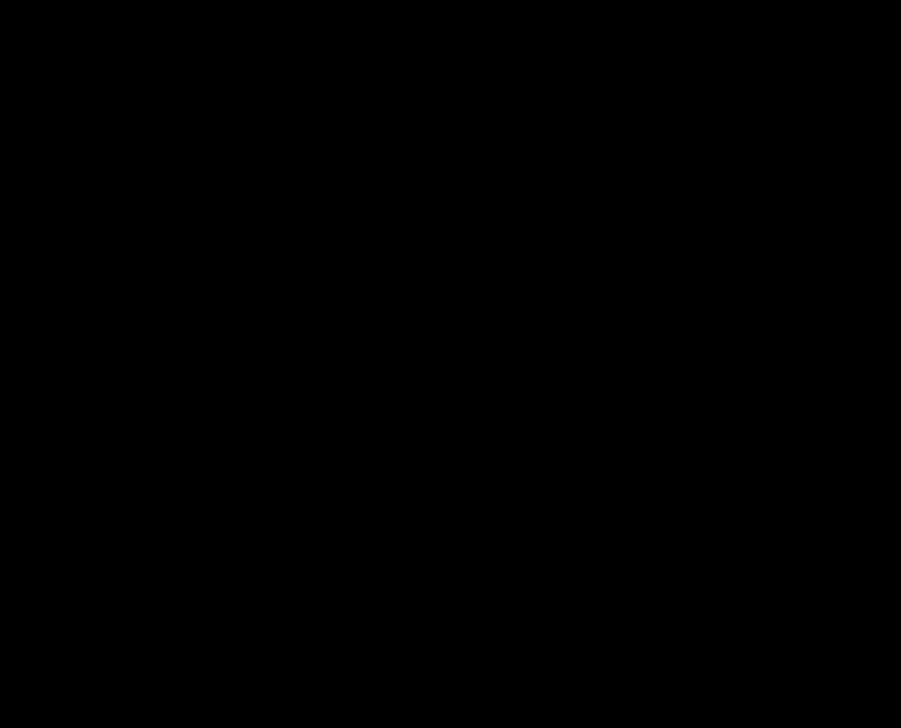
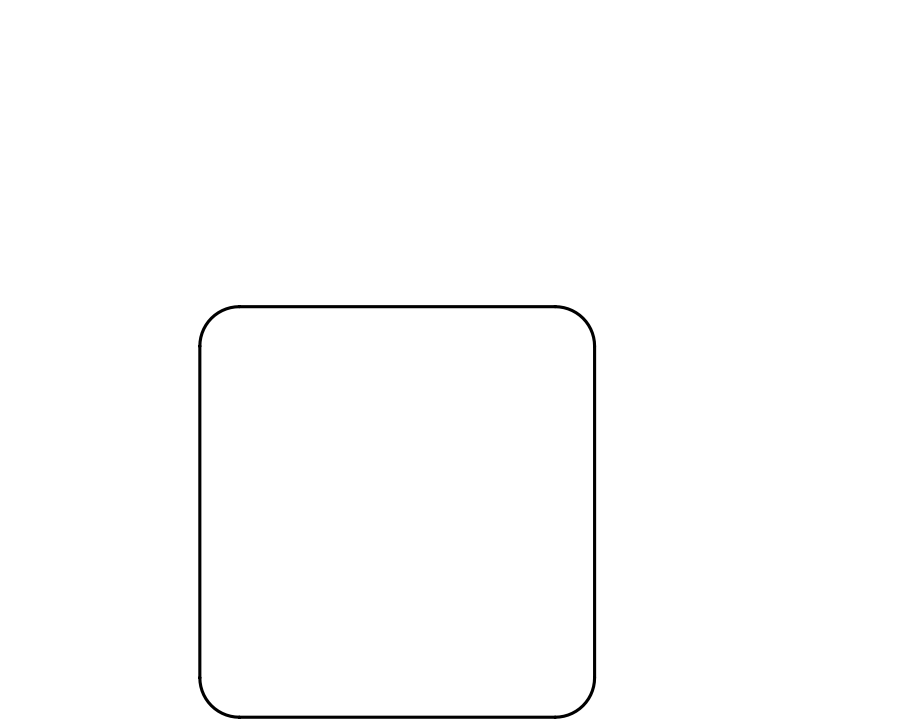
drawing: none -> [198, 305, 597, 719]

